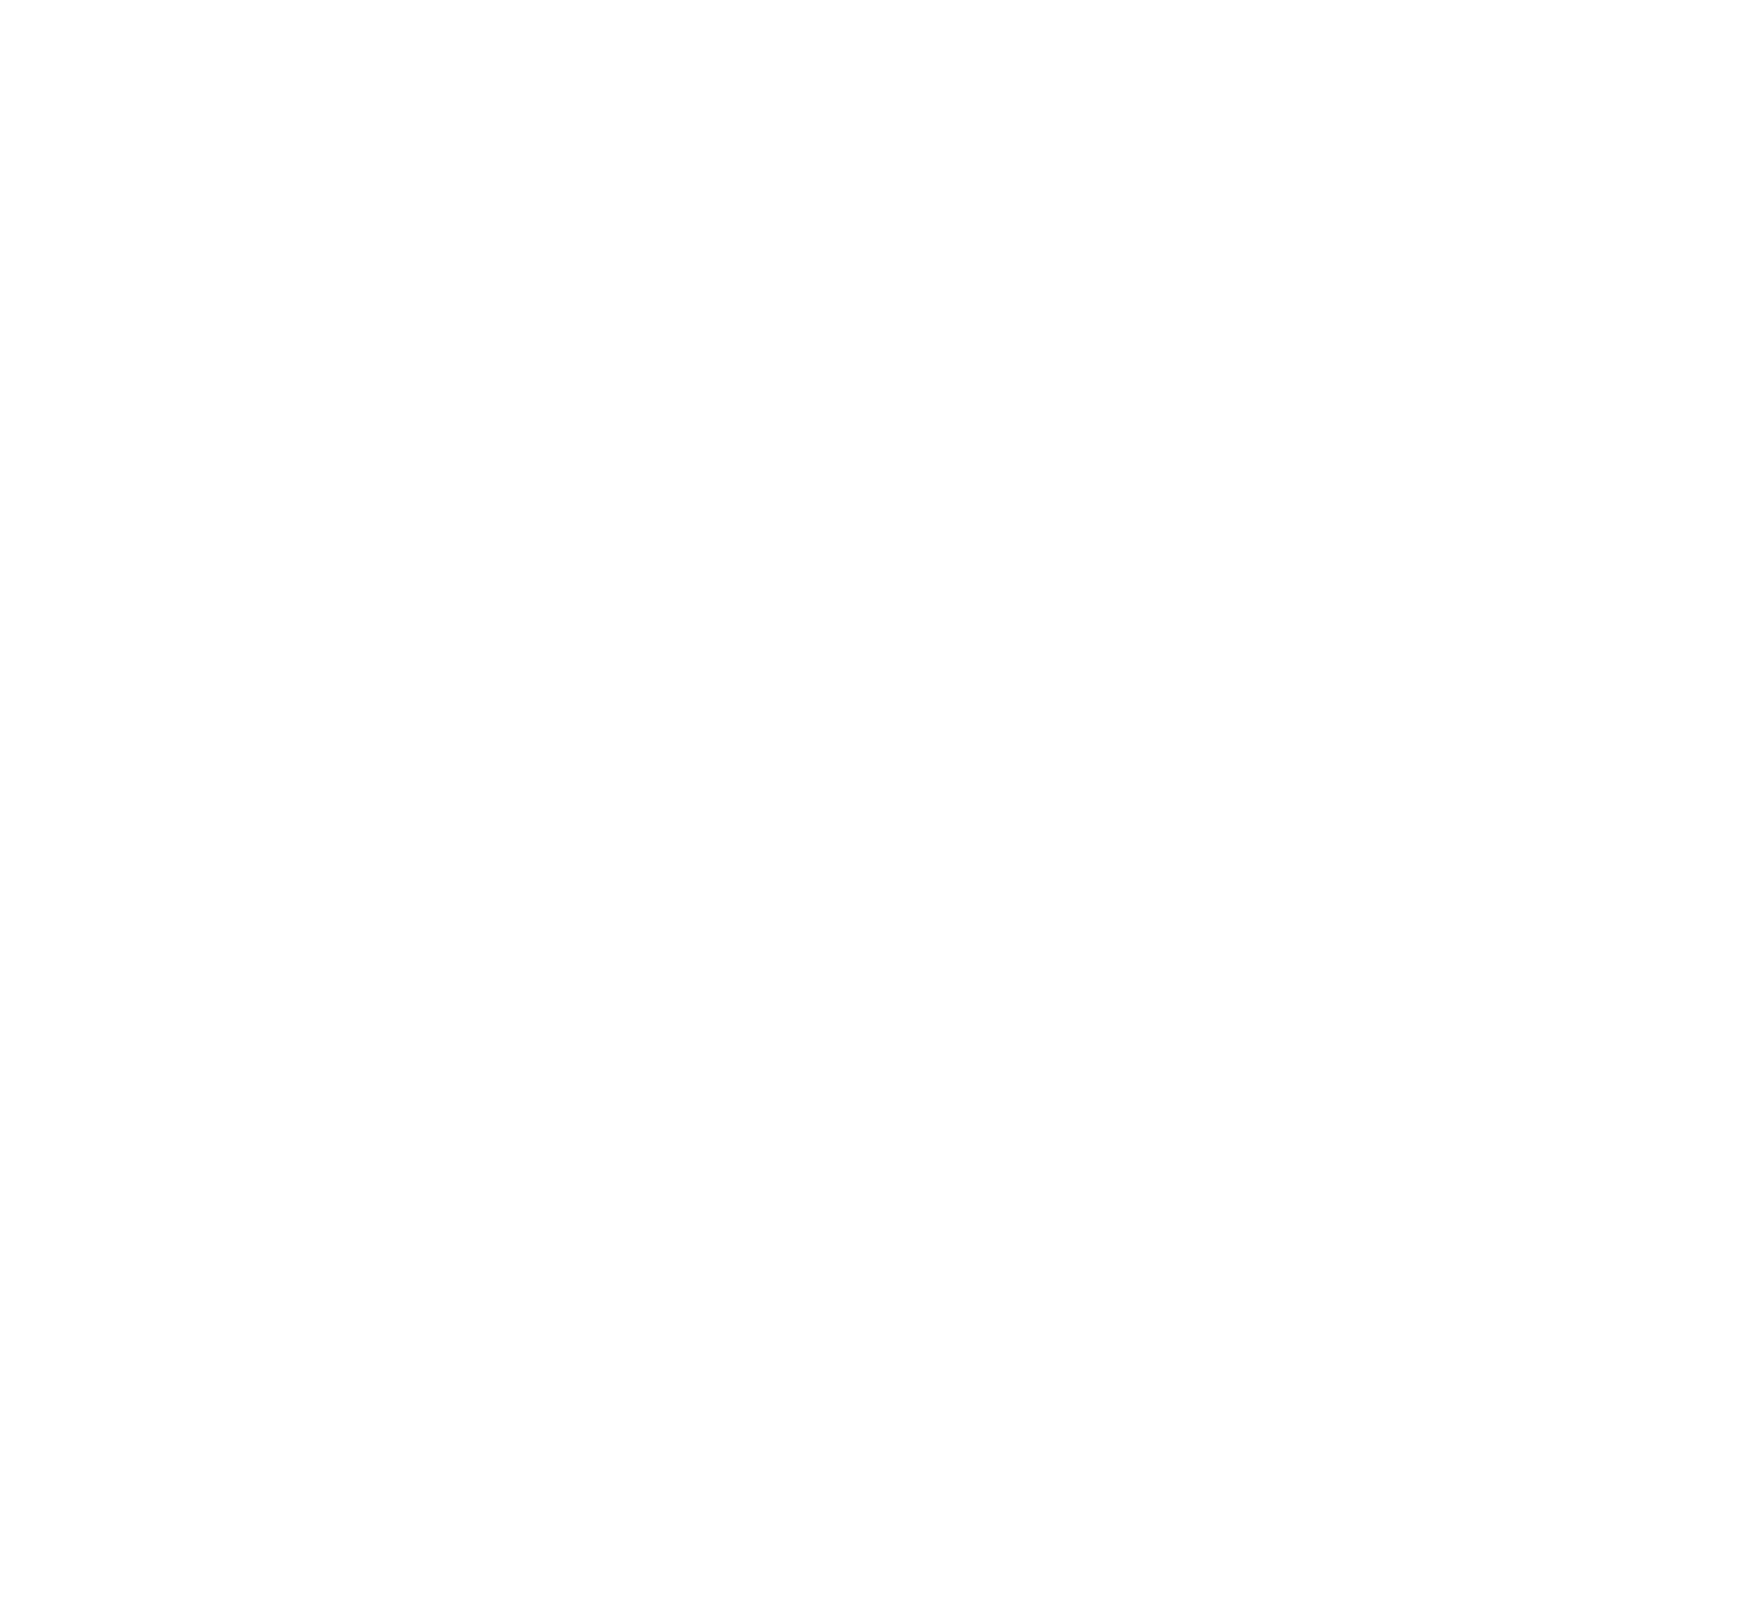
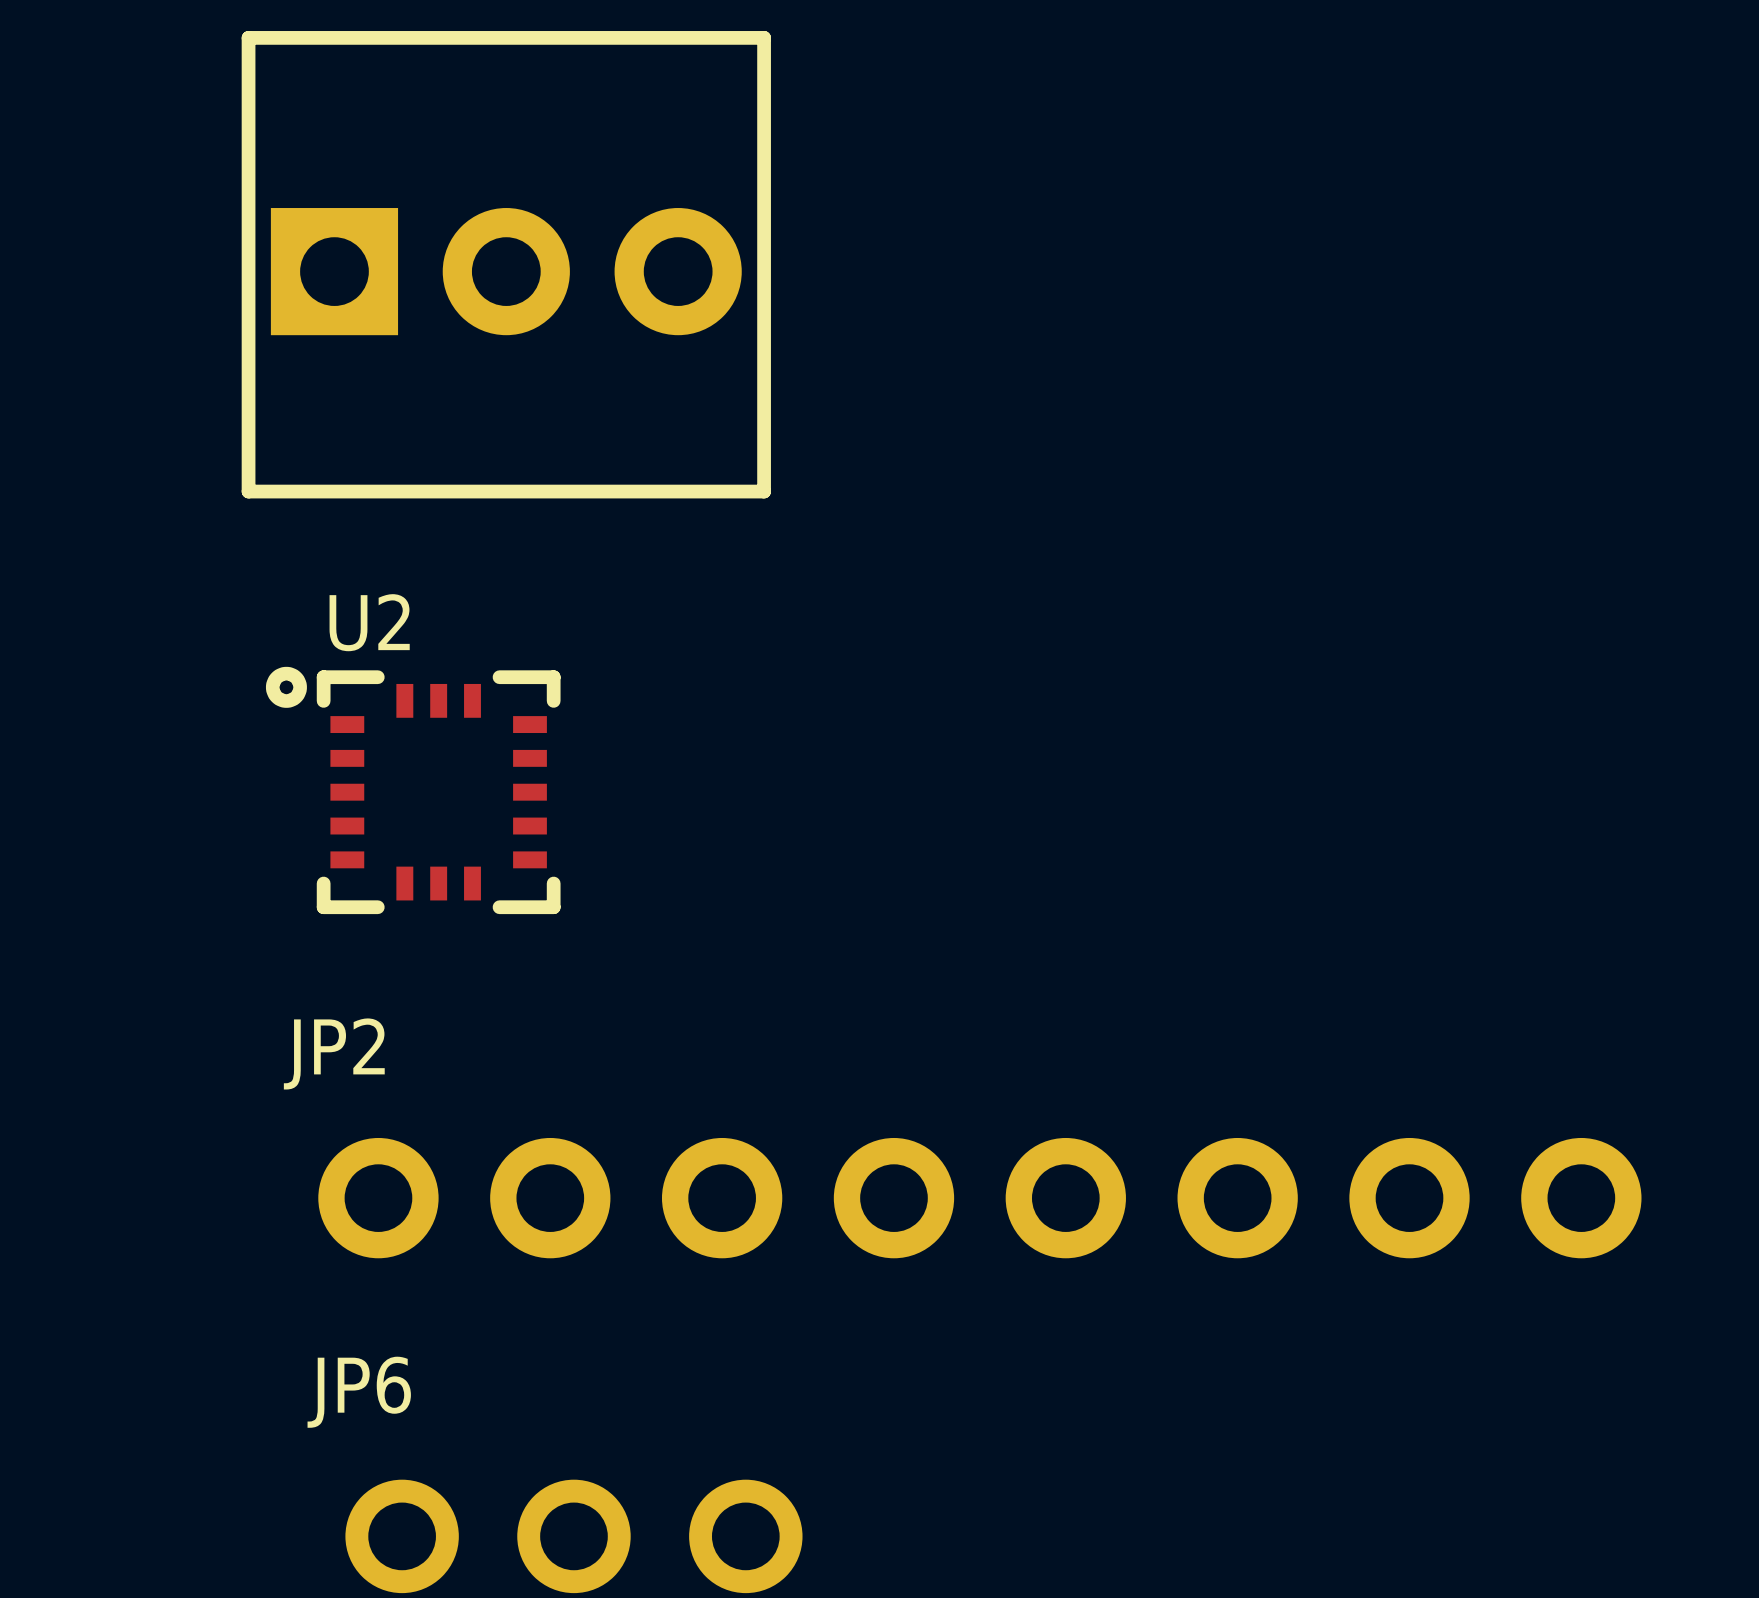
part: none -> (506, 264)
U2: none -> (413, 790)
JP2: none -> (979, 1198)
JP6: none -> (573, 1536)

